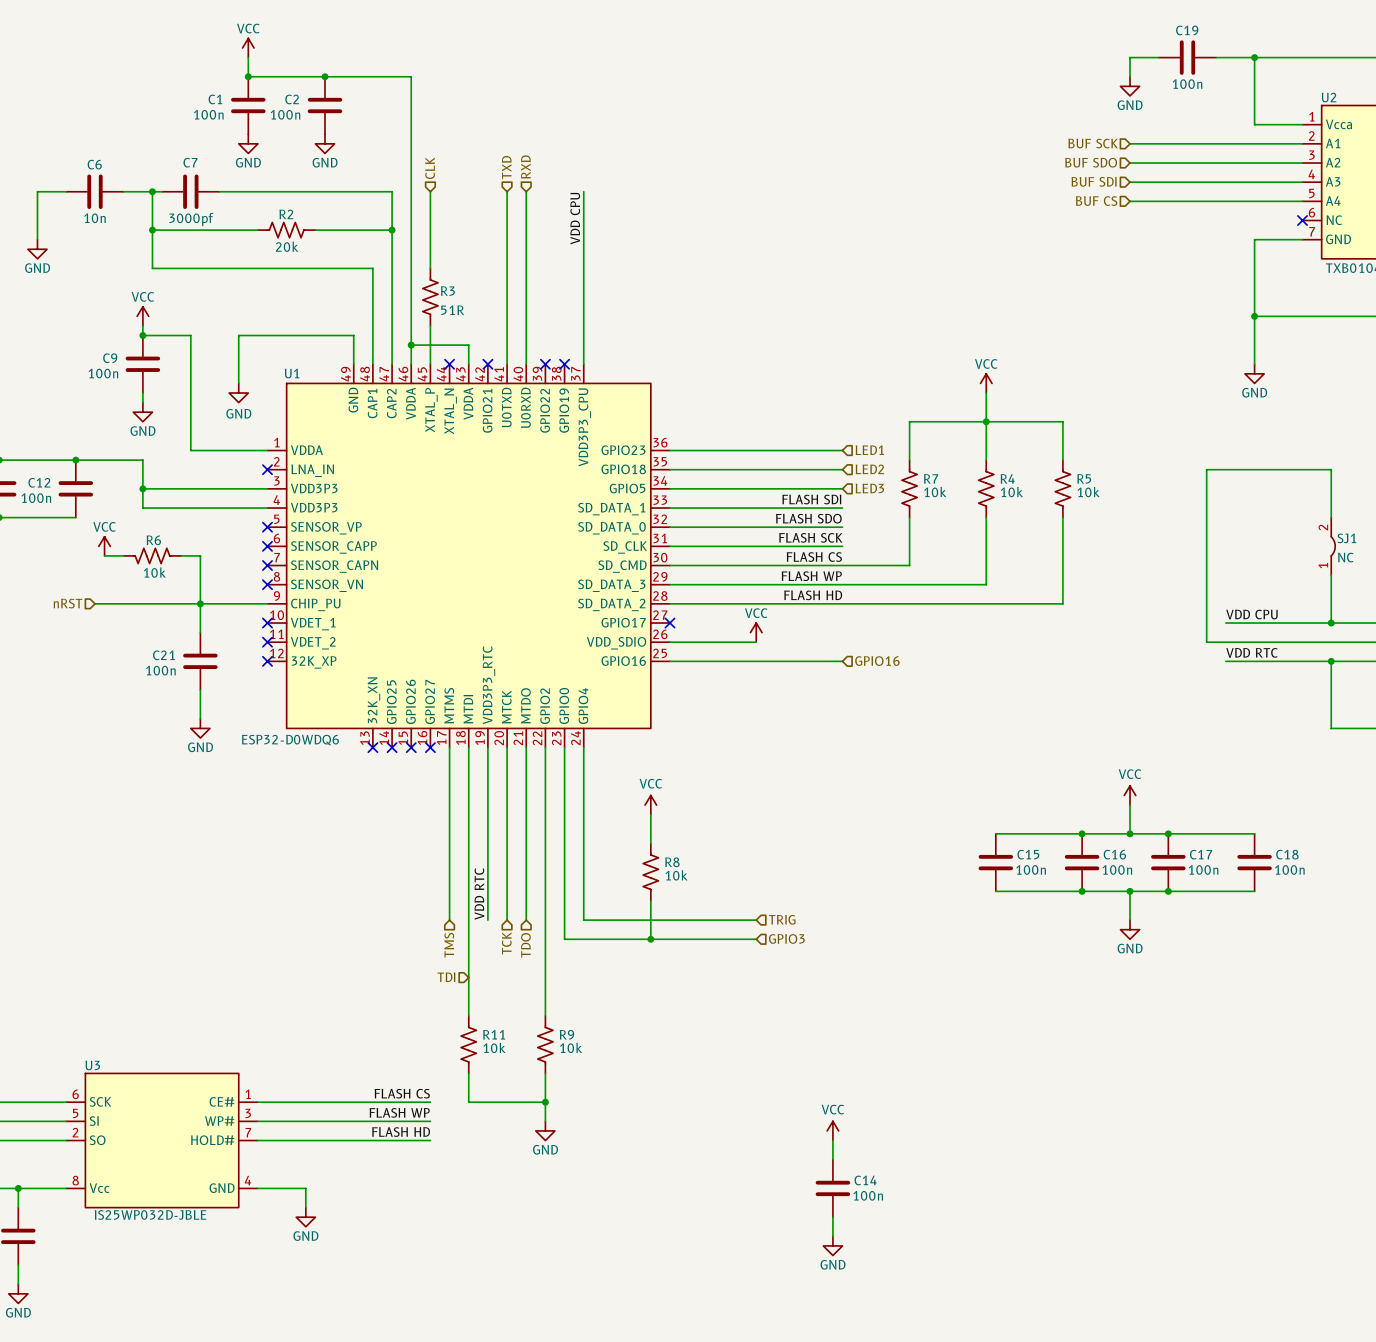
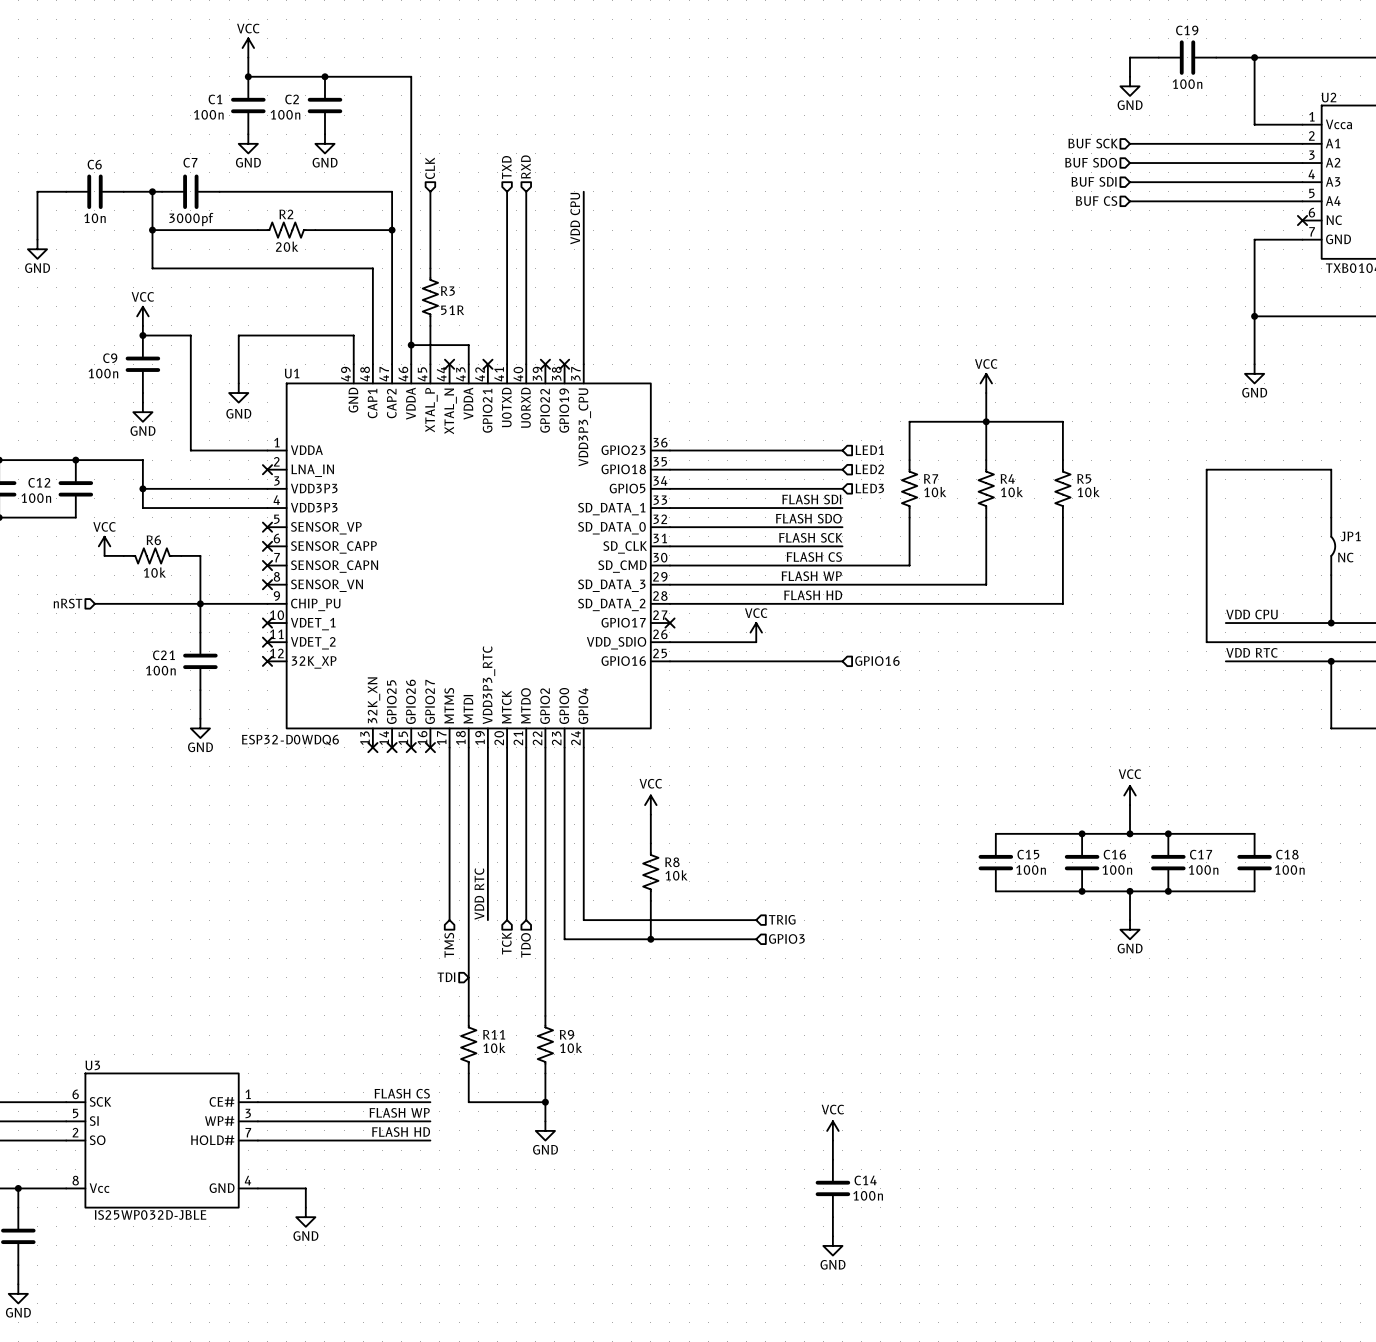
SJ1 pin number: 2 (1323, 527) -> none
SJ1 name: SJ1 (1346, 538) -> JP1 (1350, 536)
SJ1 pin number: 1 (1323, 565) -> none

